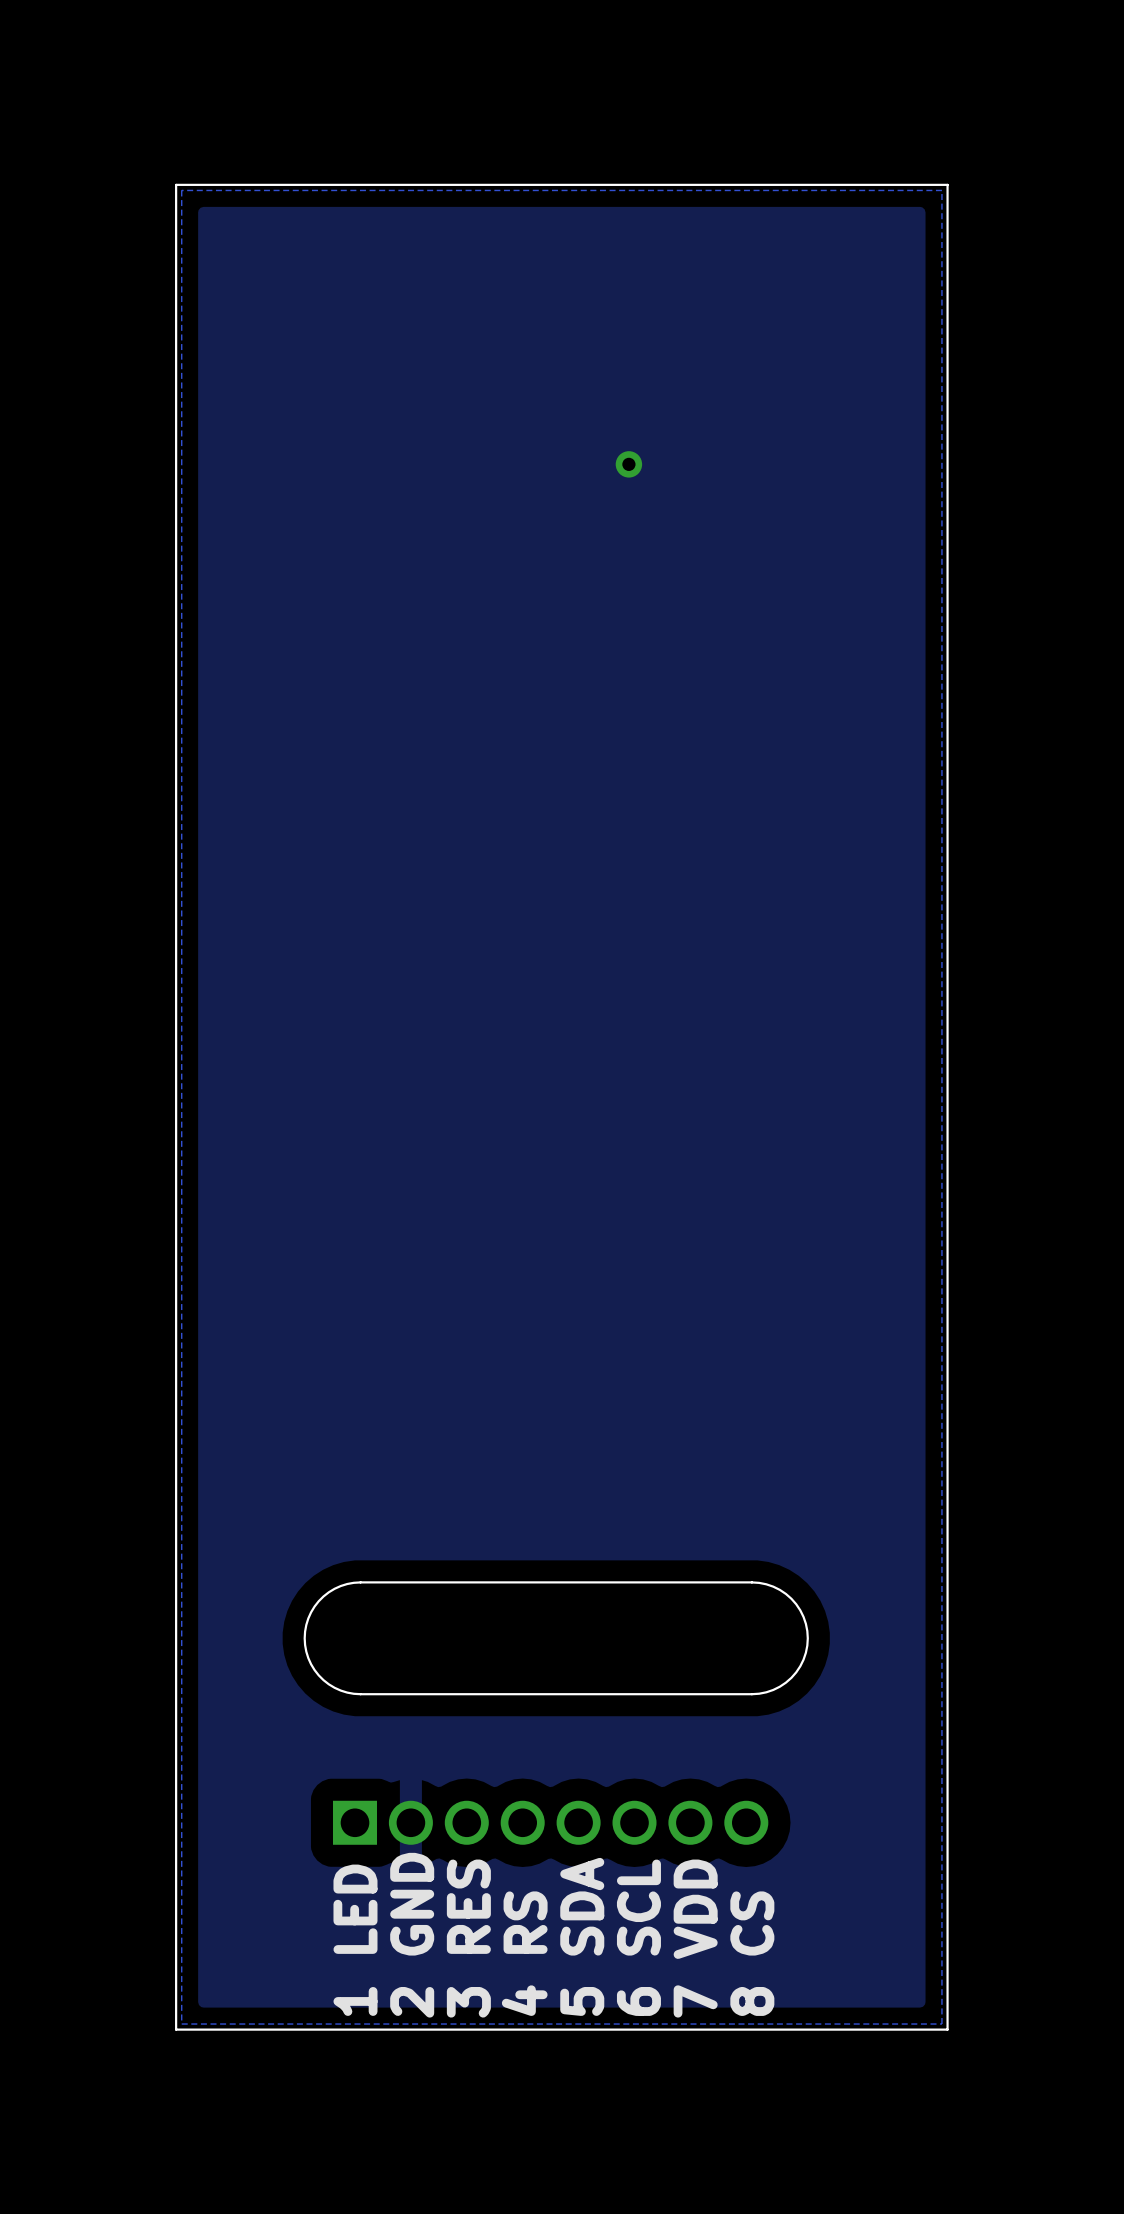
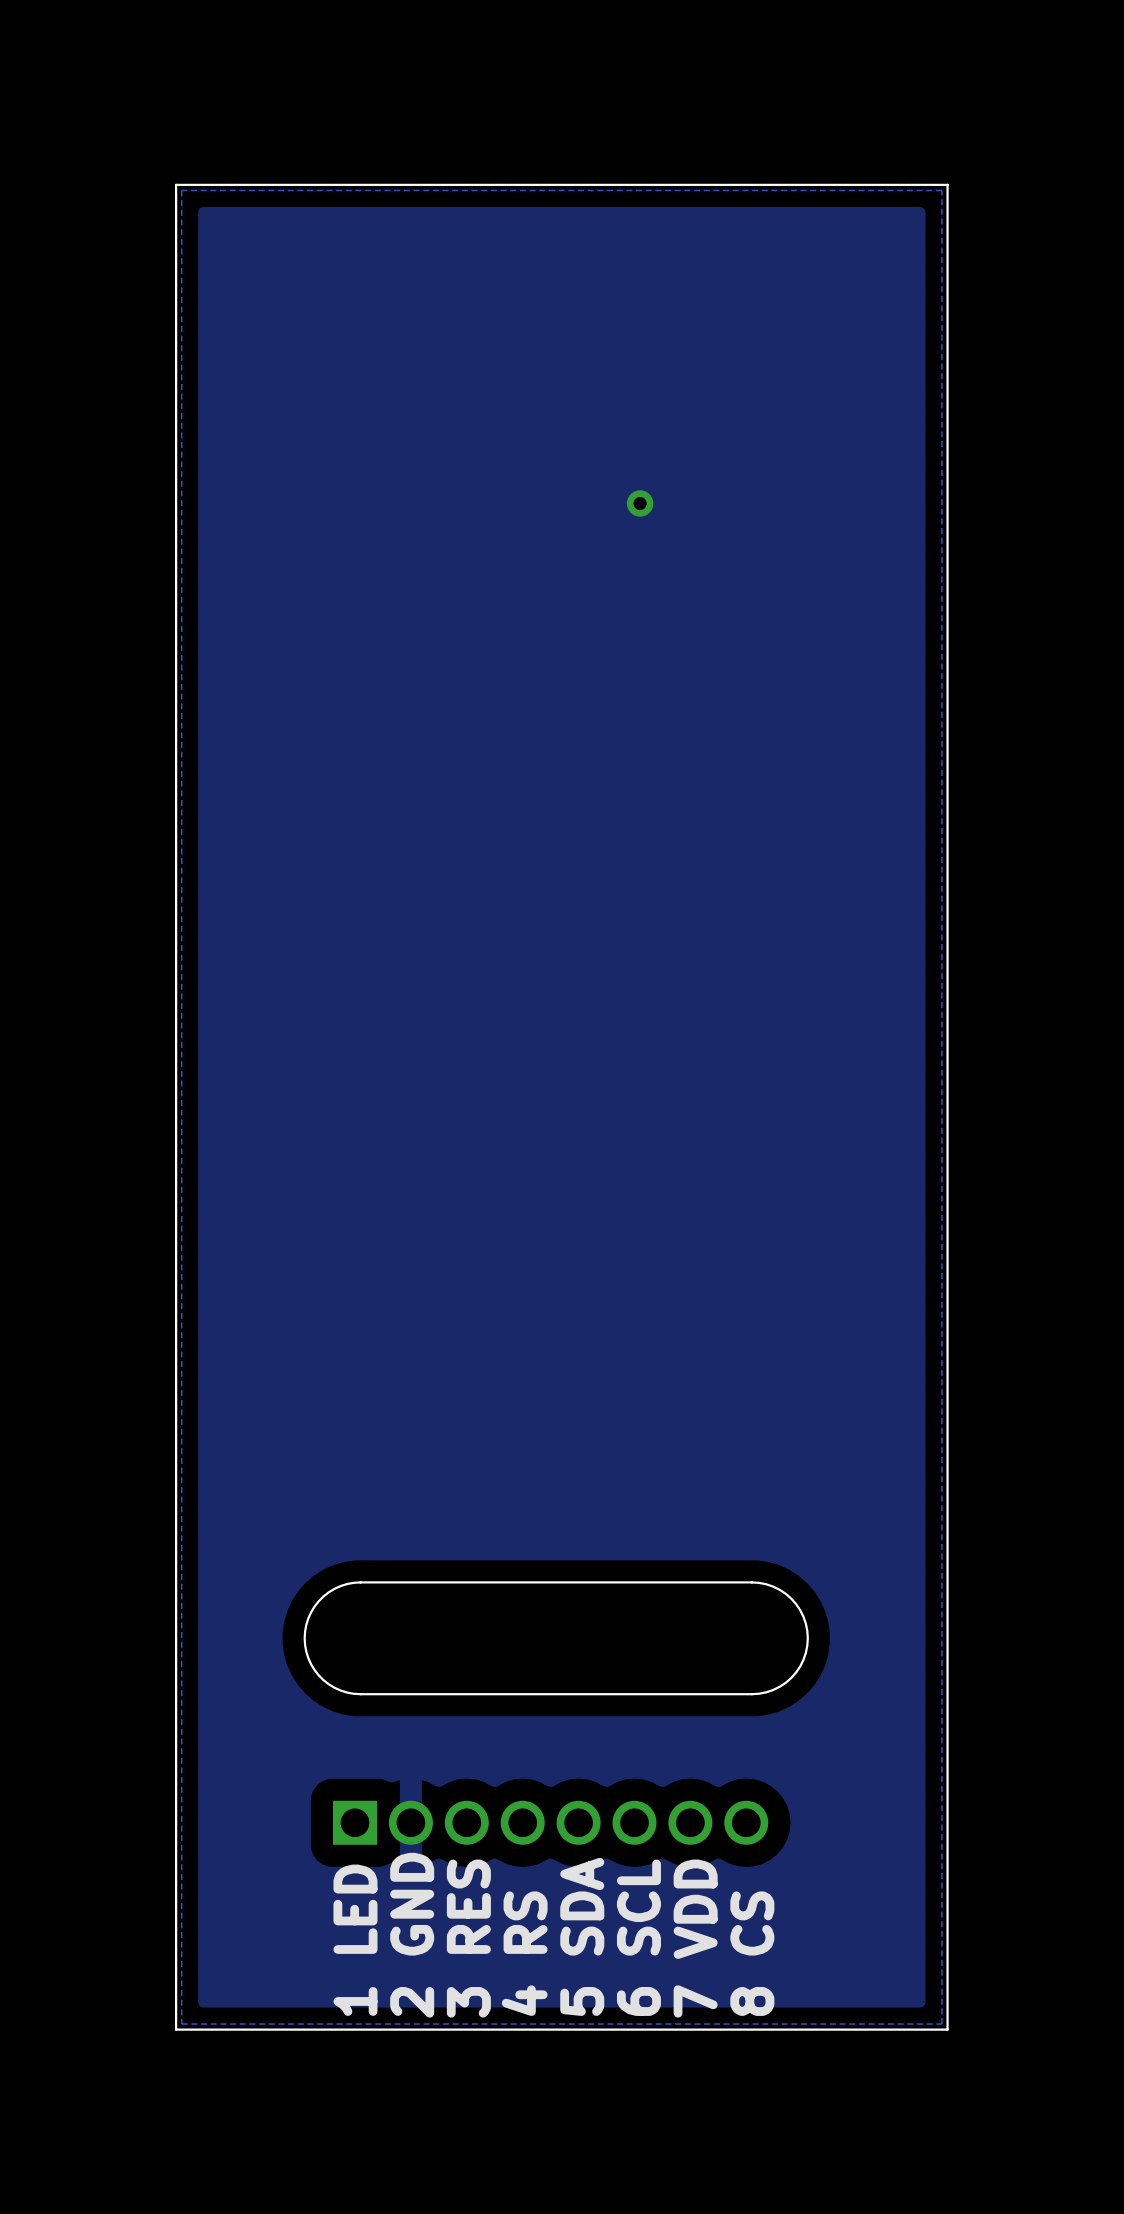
via position: (628, 464) -> (640, 503)

